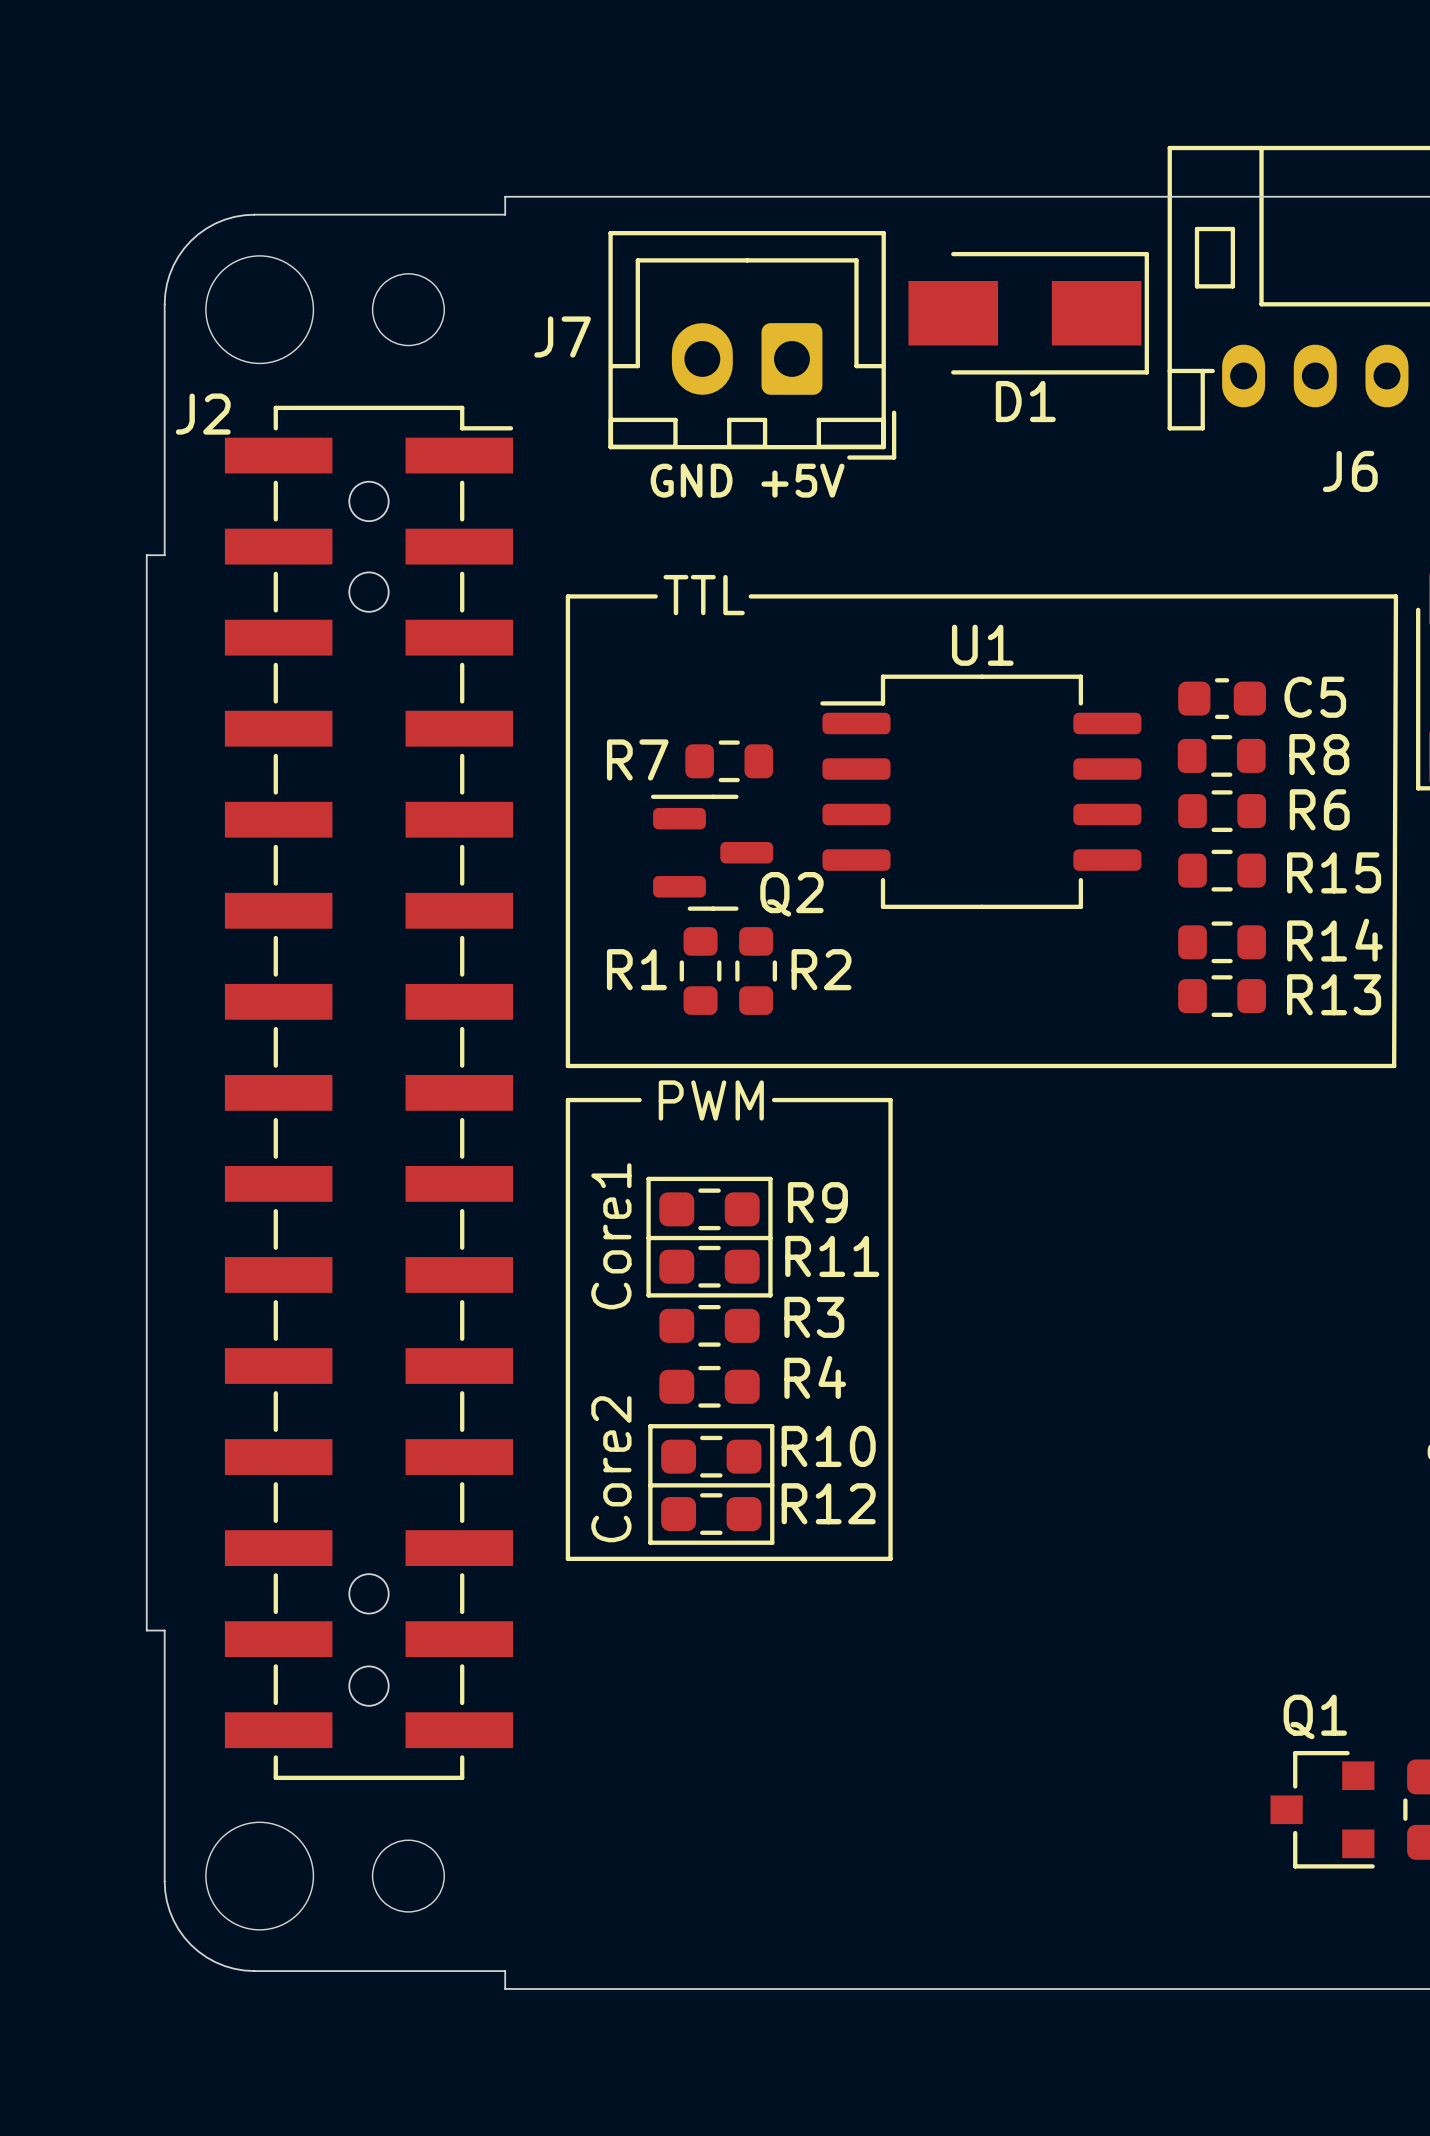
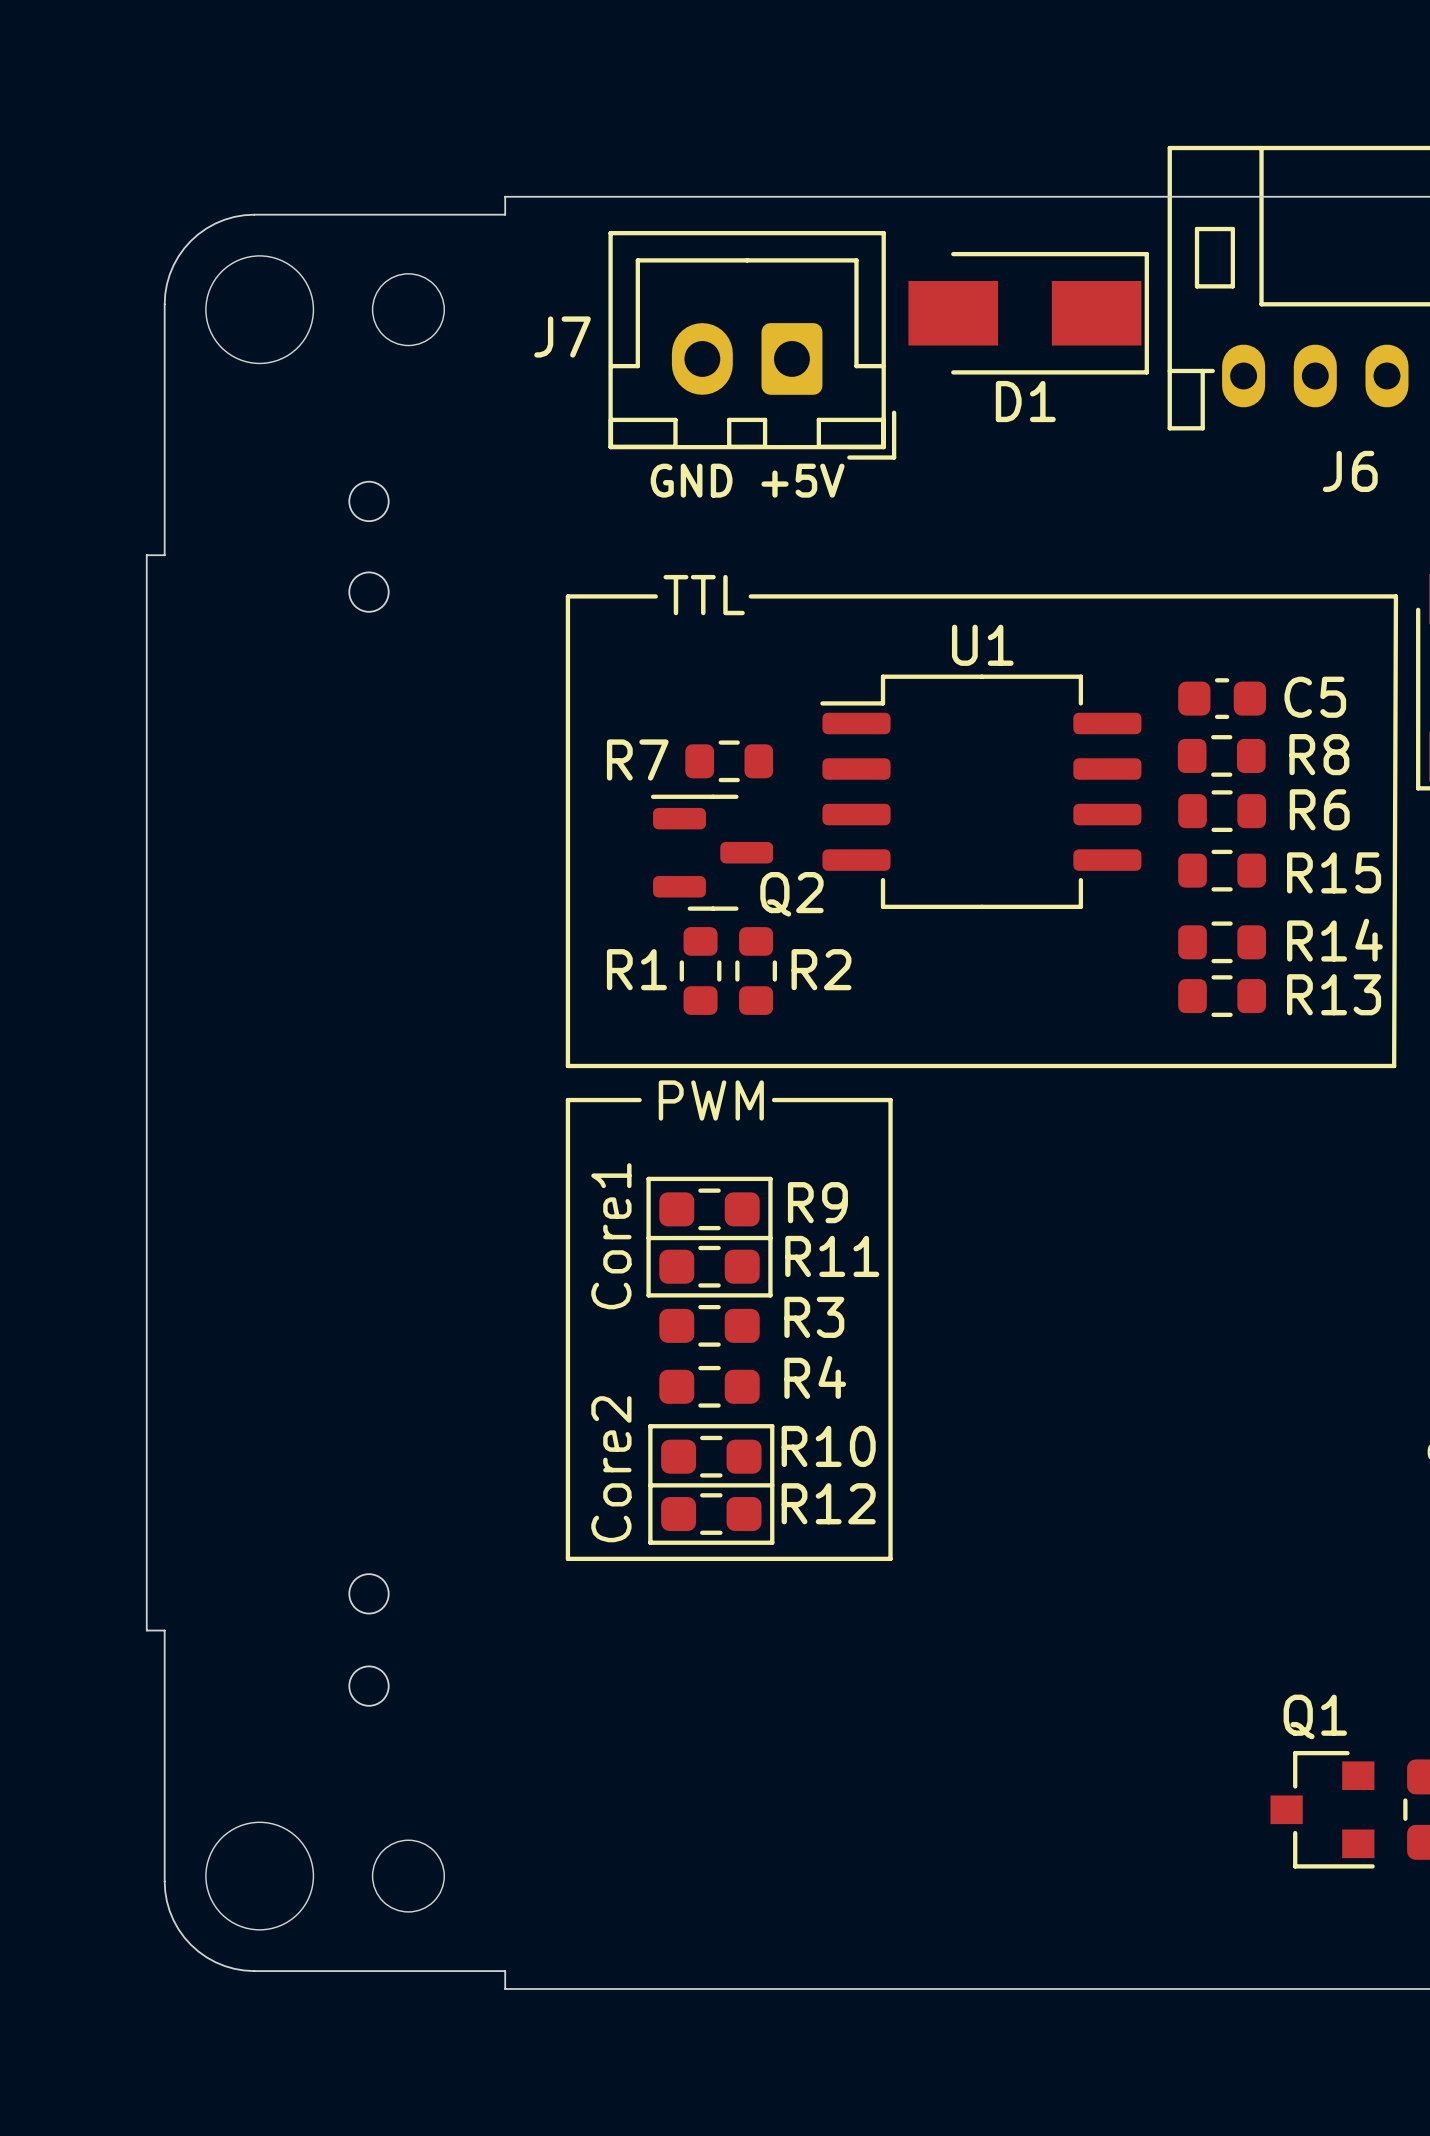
J2: (369, 1092) -> none

